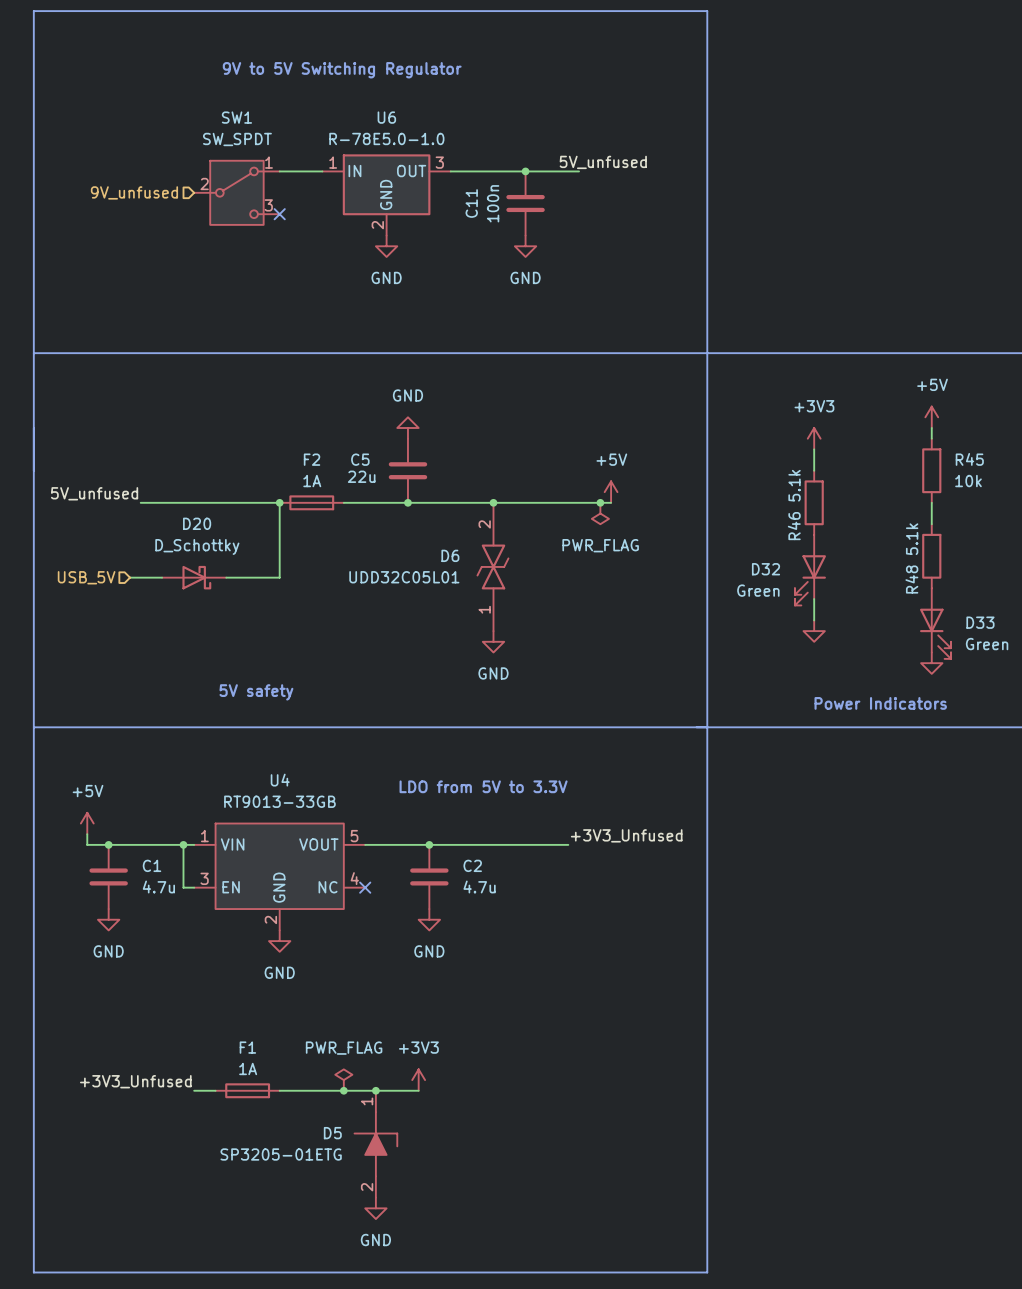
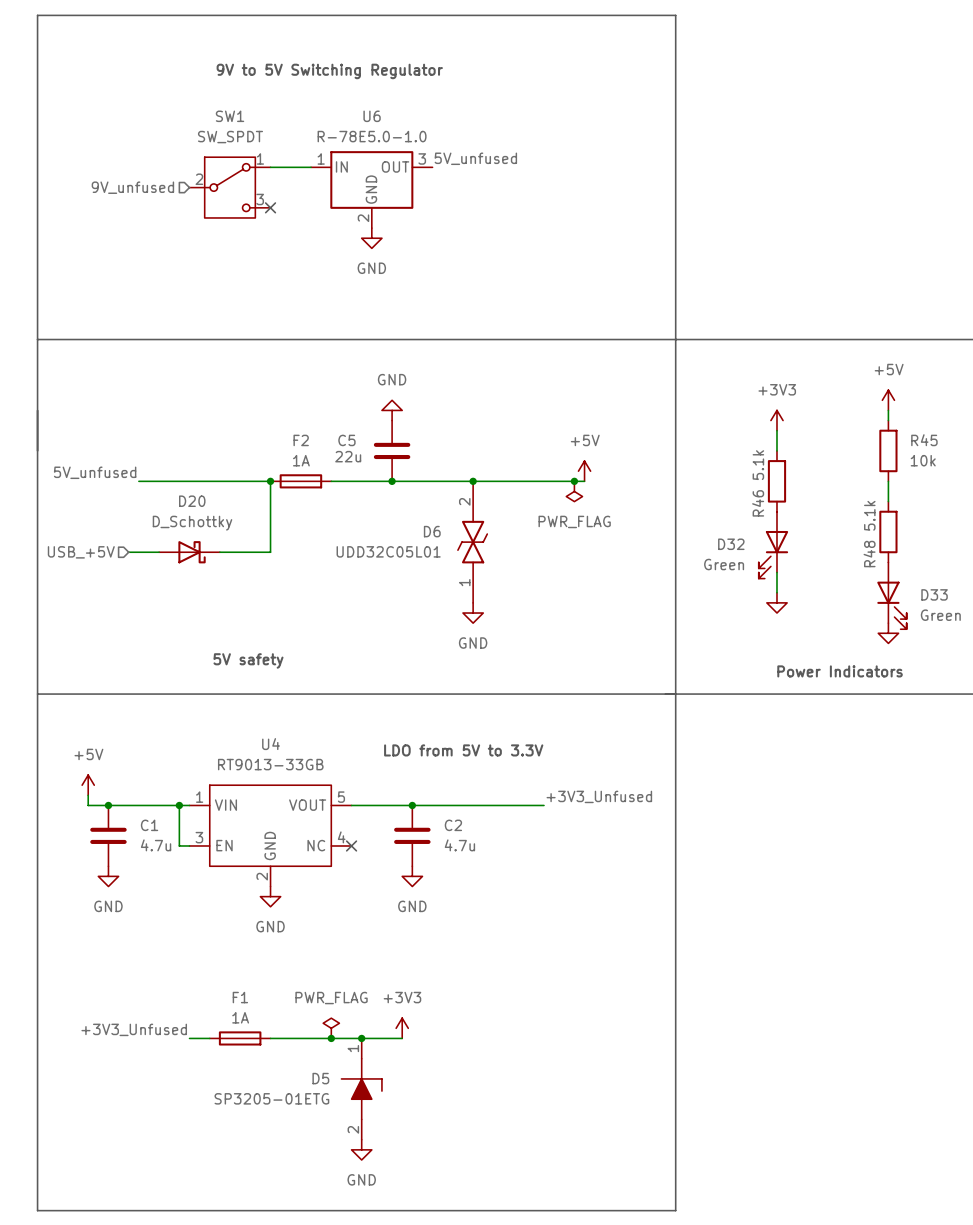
label position: 5V_unfused (603, 162) -> 5V_unfused (475, 158)
wire: (450, 171) (579, 171) -> none
junction: (525, 171) -> none
C11: 100n (525, 203) -> none
power symbol: GND (525, 246) -> none
hierarchical label: USB_5V (86, 577) -> USB_+5V (81, 552)

